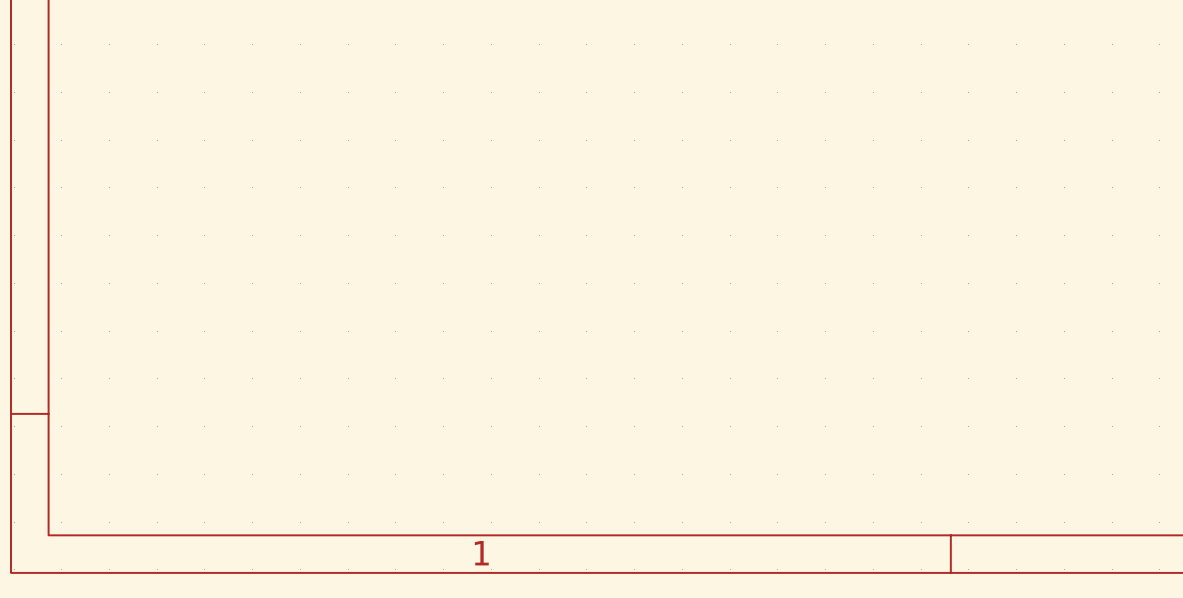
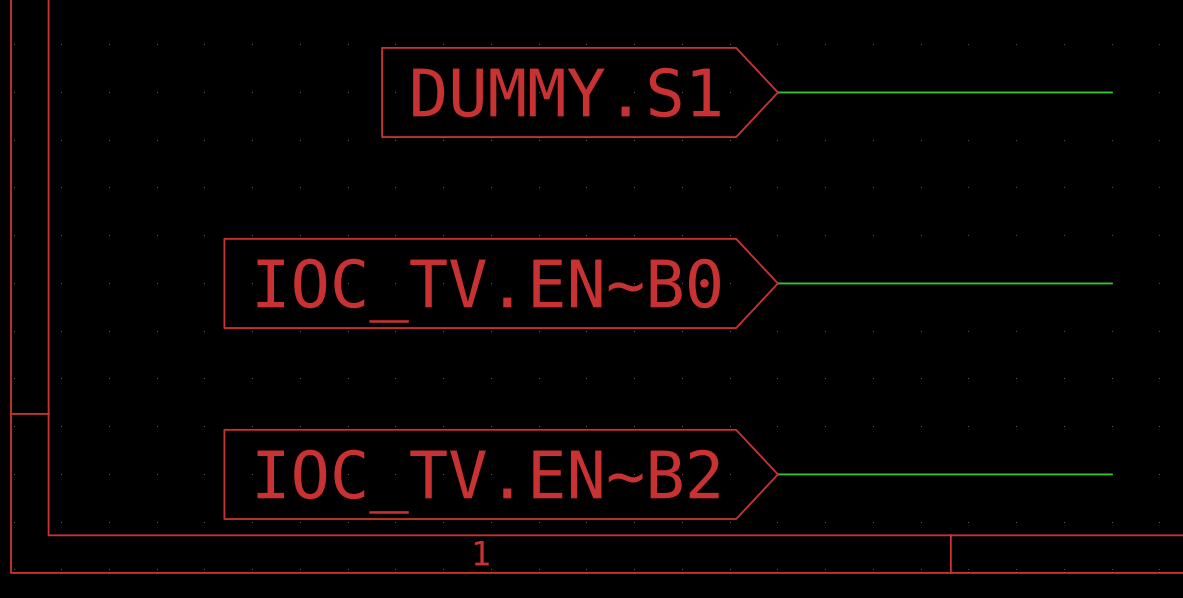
global label: none -> DUMMY.S1 (566, 92)
wire: none -> (777, 92) (1112, 92)
wire: none -> (777, 283) (1112, 283)
global label: none -> IOC_TV.EN~B0 (488, 290)
wire: none -> (777, 474) (1112, 474)
global label: none -> IOC_TV.EN~B2 (488, 481)

